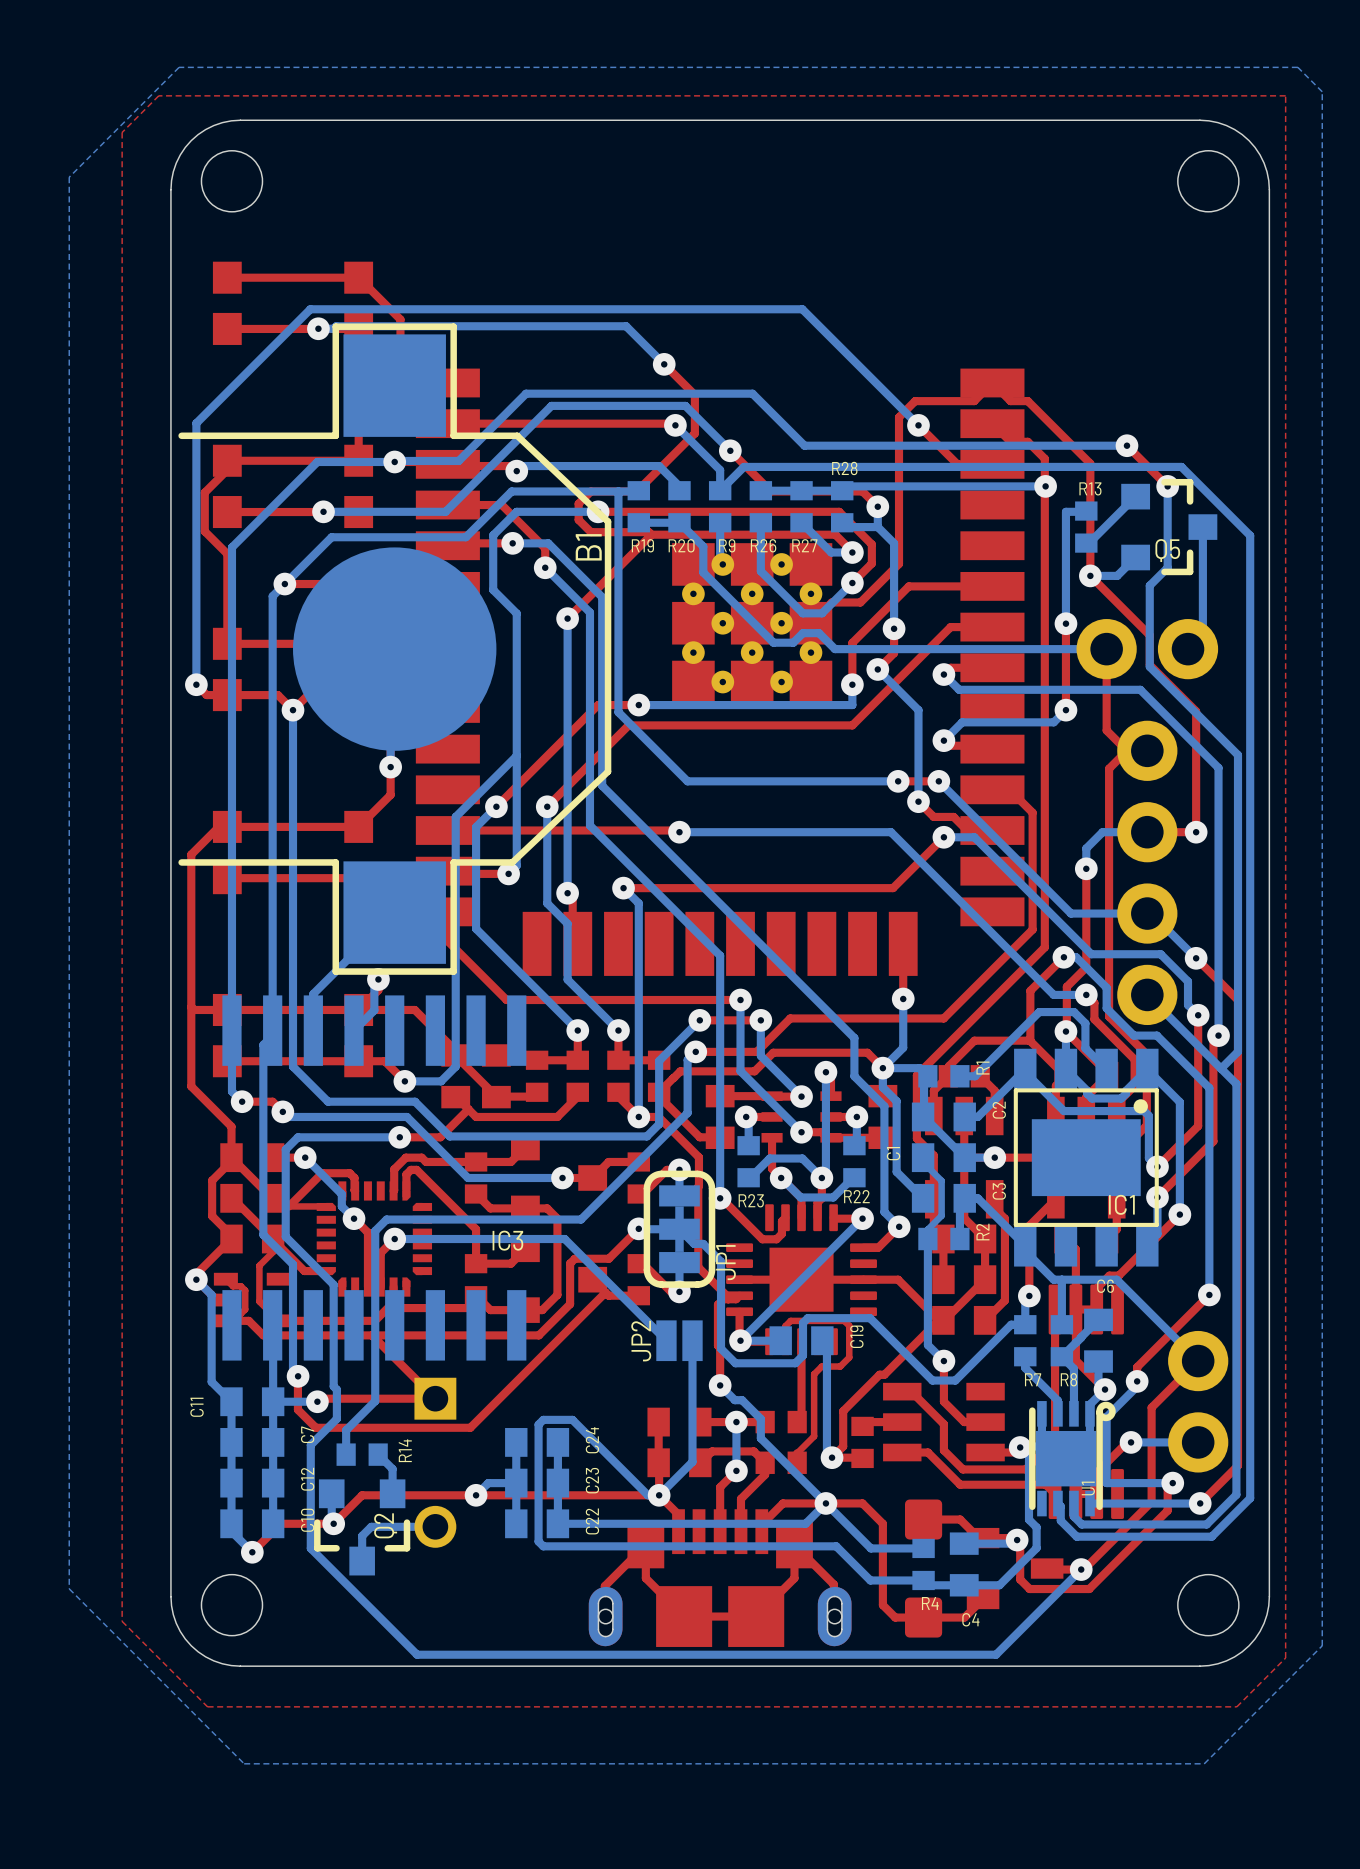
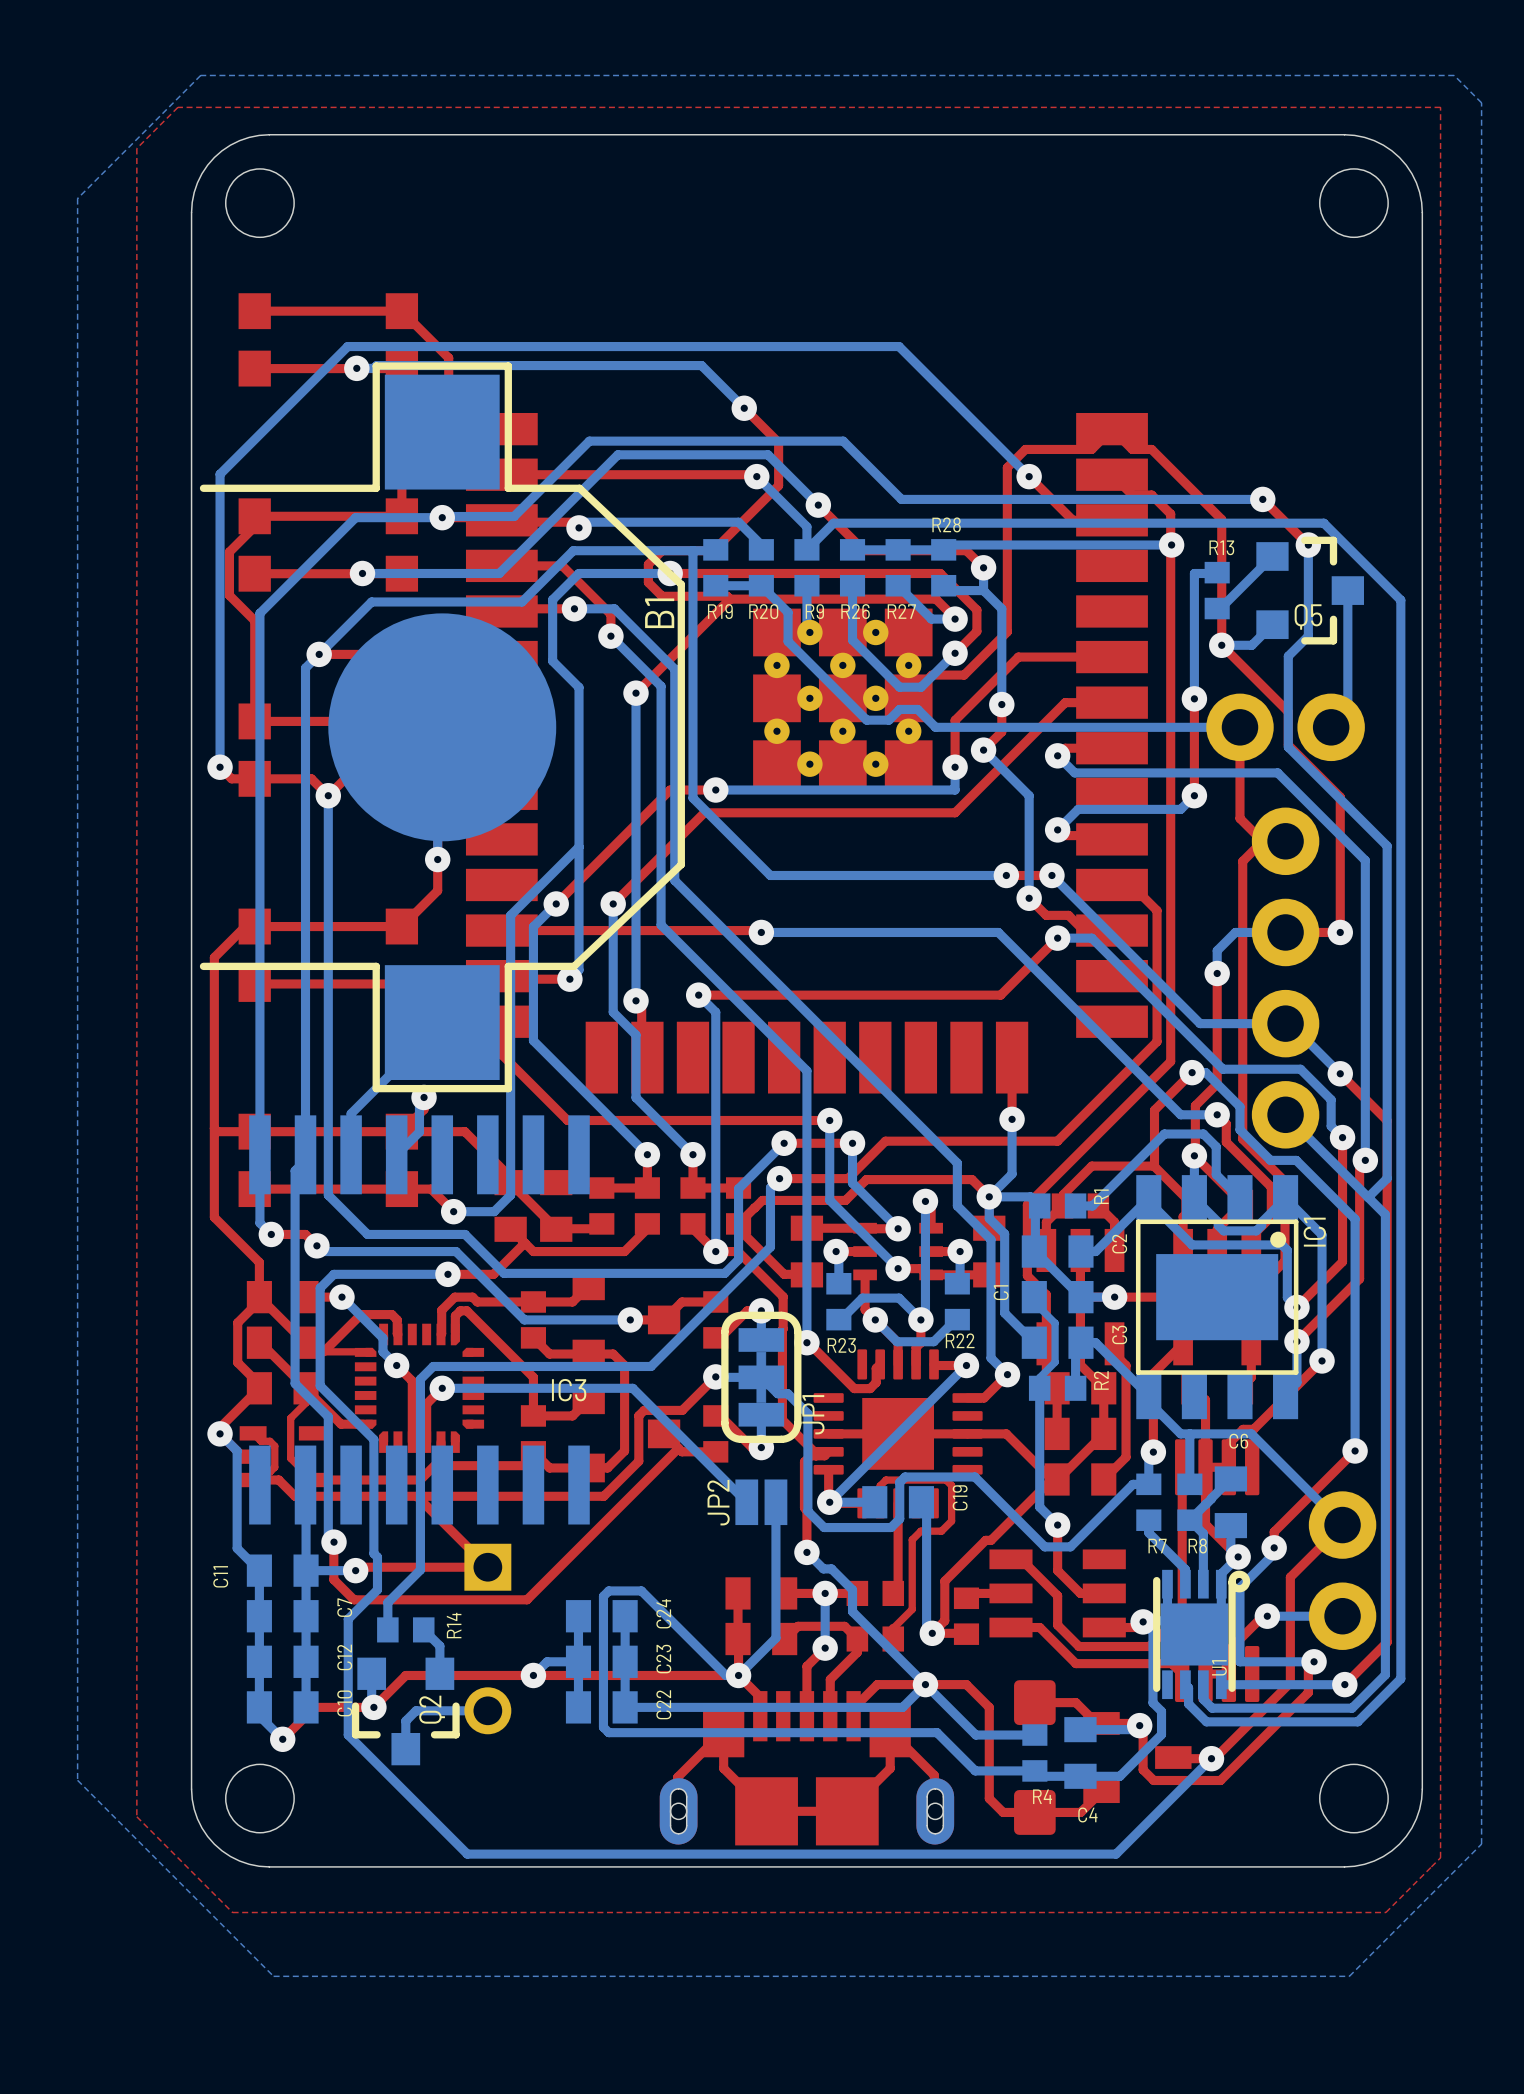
IC1 name rotation: 0° (1121, 1204) -> 90° counterclockwise (1314, 1232)
IC1 name position: IC1 (1121, 1204) -> IC1 (1314, 1232)

